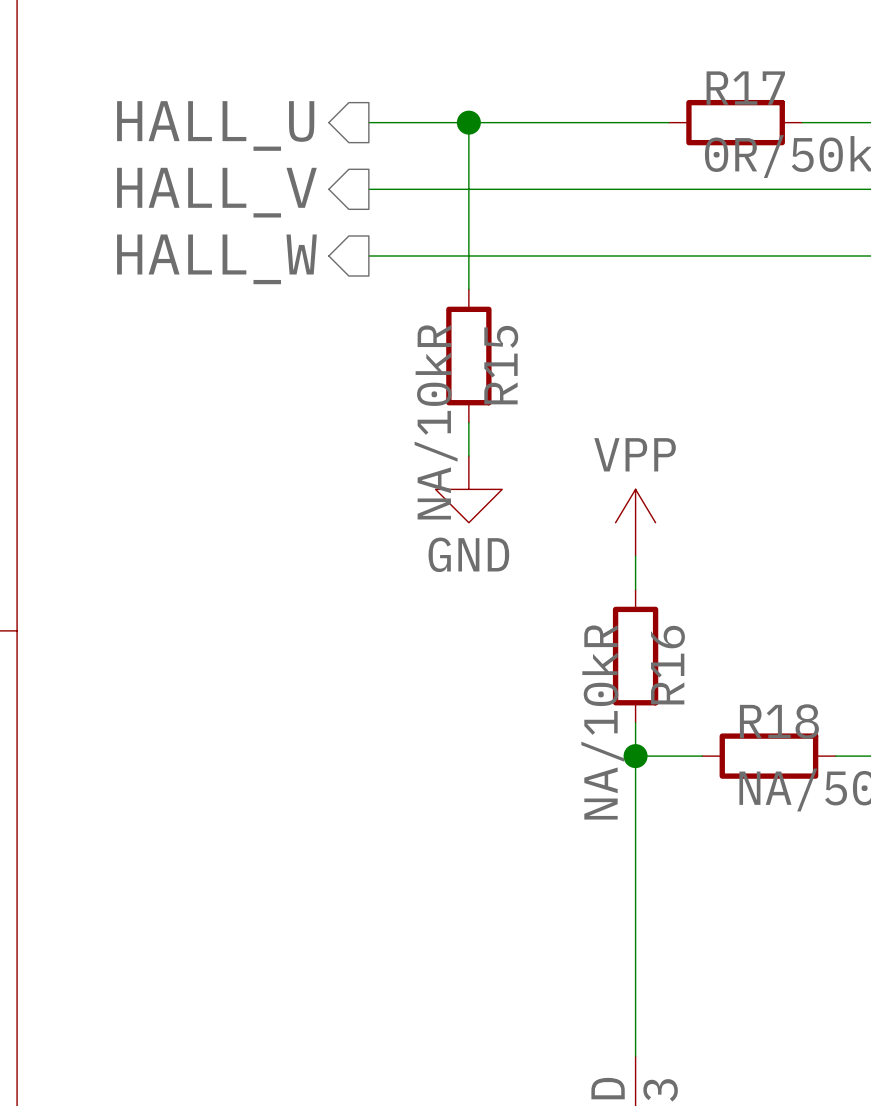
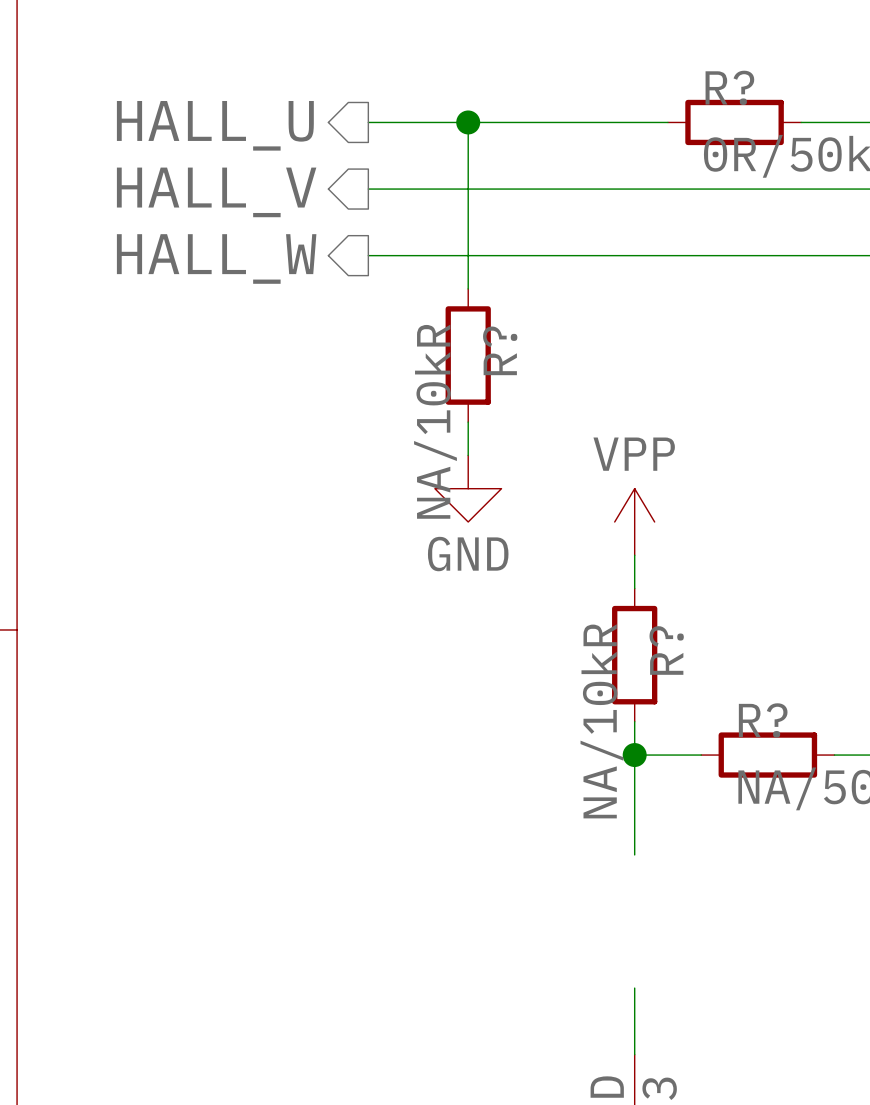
R17 name: R17 (745, 88) -> R? (729, 87)
R15 name: R15 (501, 365) -> R? (500, 350)
R16 name: R16 (667, 665) -> R? (666, 650)
R18 name: R18 (779, 721) -> R? (763, 720)
wire: (635, 856) (635, 989) -> none

